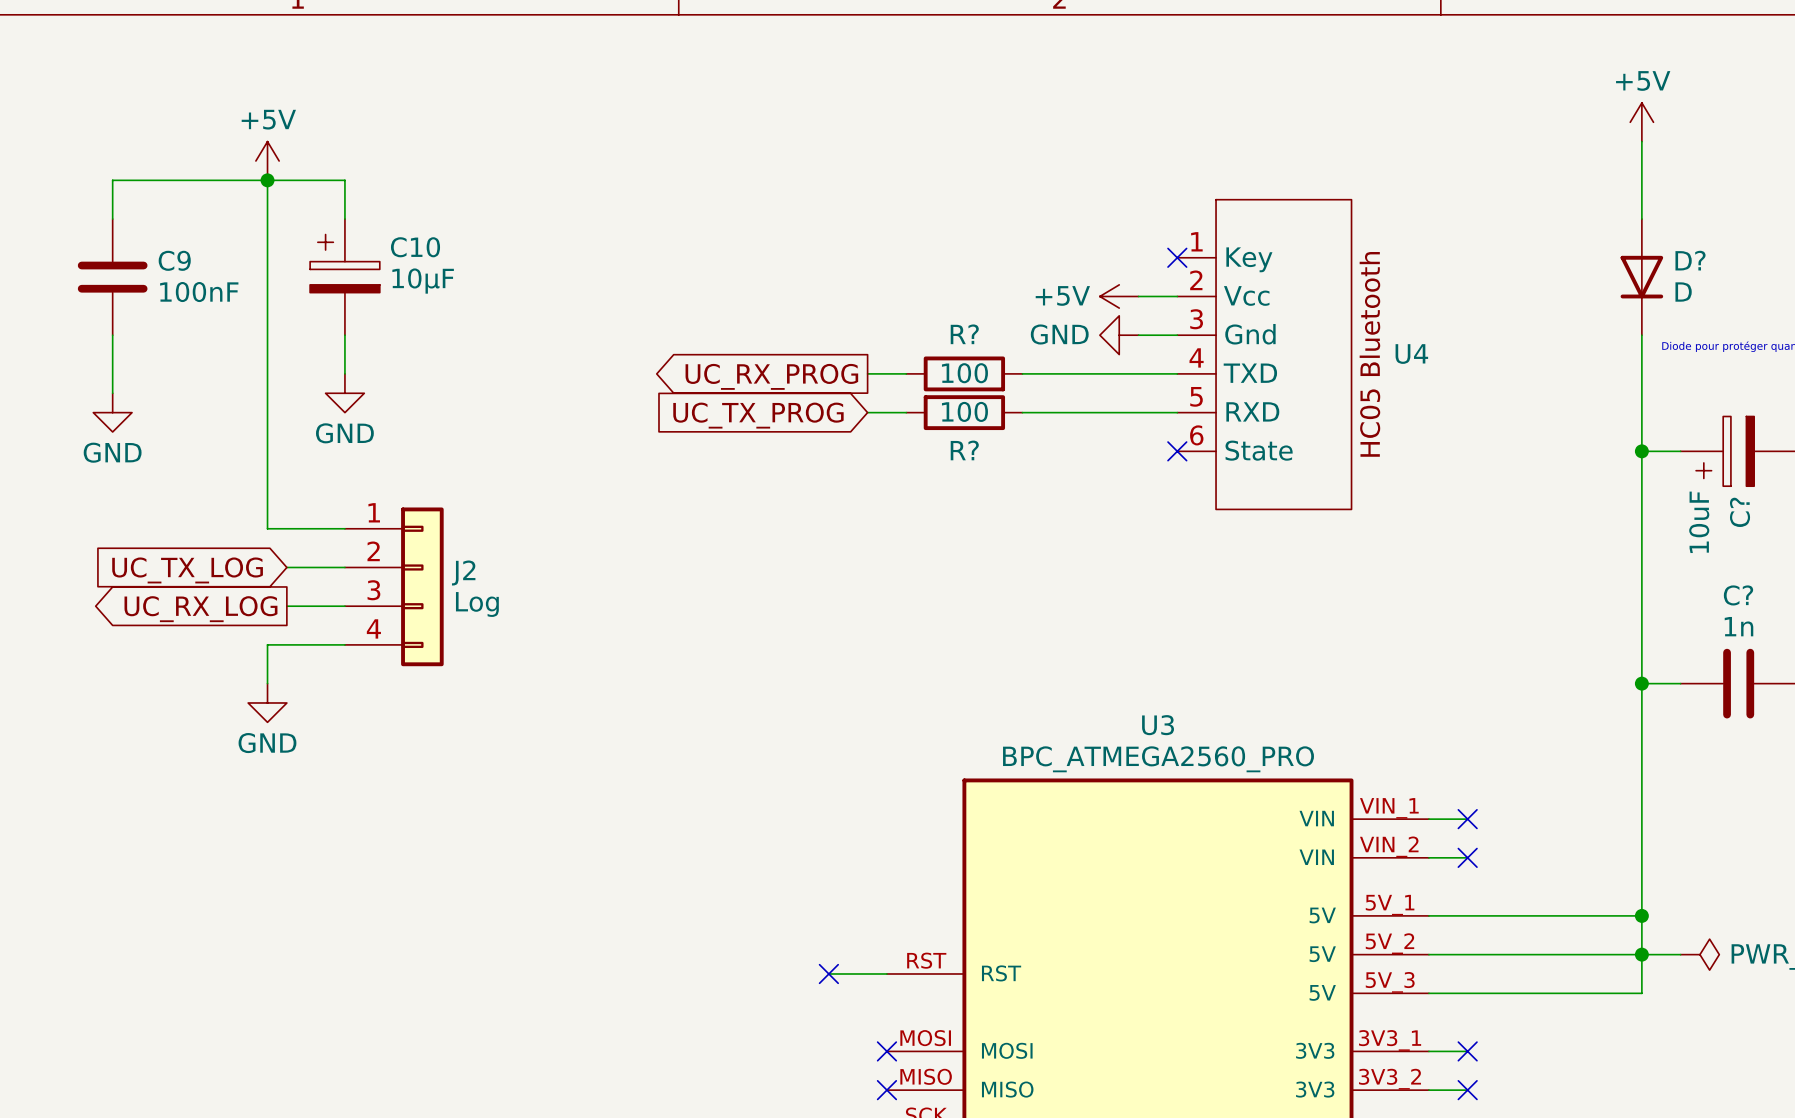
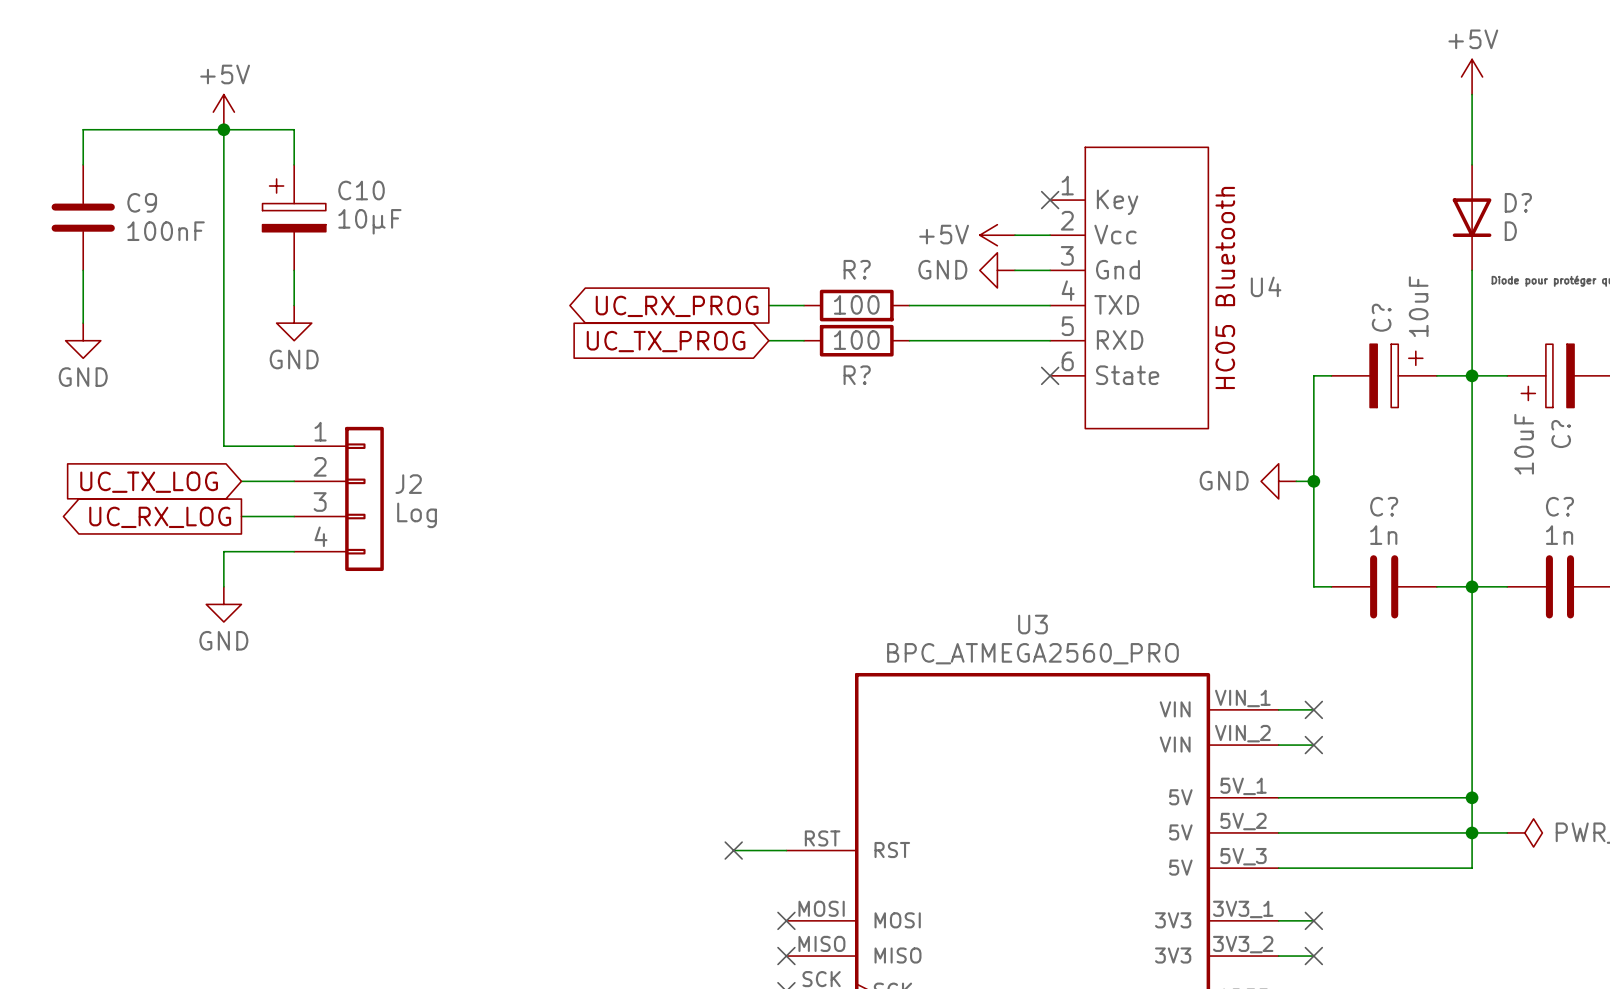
wire: none -> (1331, 375) (1313, 375) (1313, 586) (1331, 586)
C?: none -> 10uF (1384, 375)
wire: none -> (1436, 375) (1472, 375)
power symbol: none -> GND (1278, 481)
wire: none -> (1296, 481) (1313, 481)
junction: none -> (1313, 481)
C?: none -> 1n (1384, 586)
wire: none -> (1436, 586) (1472, 586)

